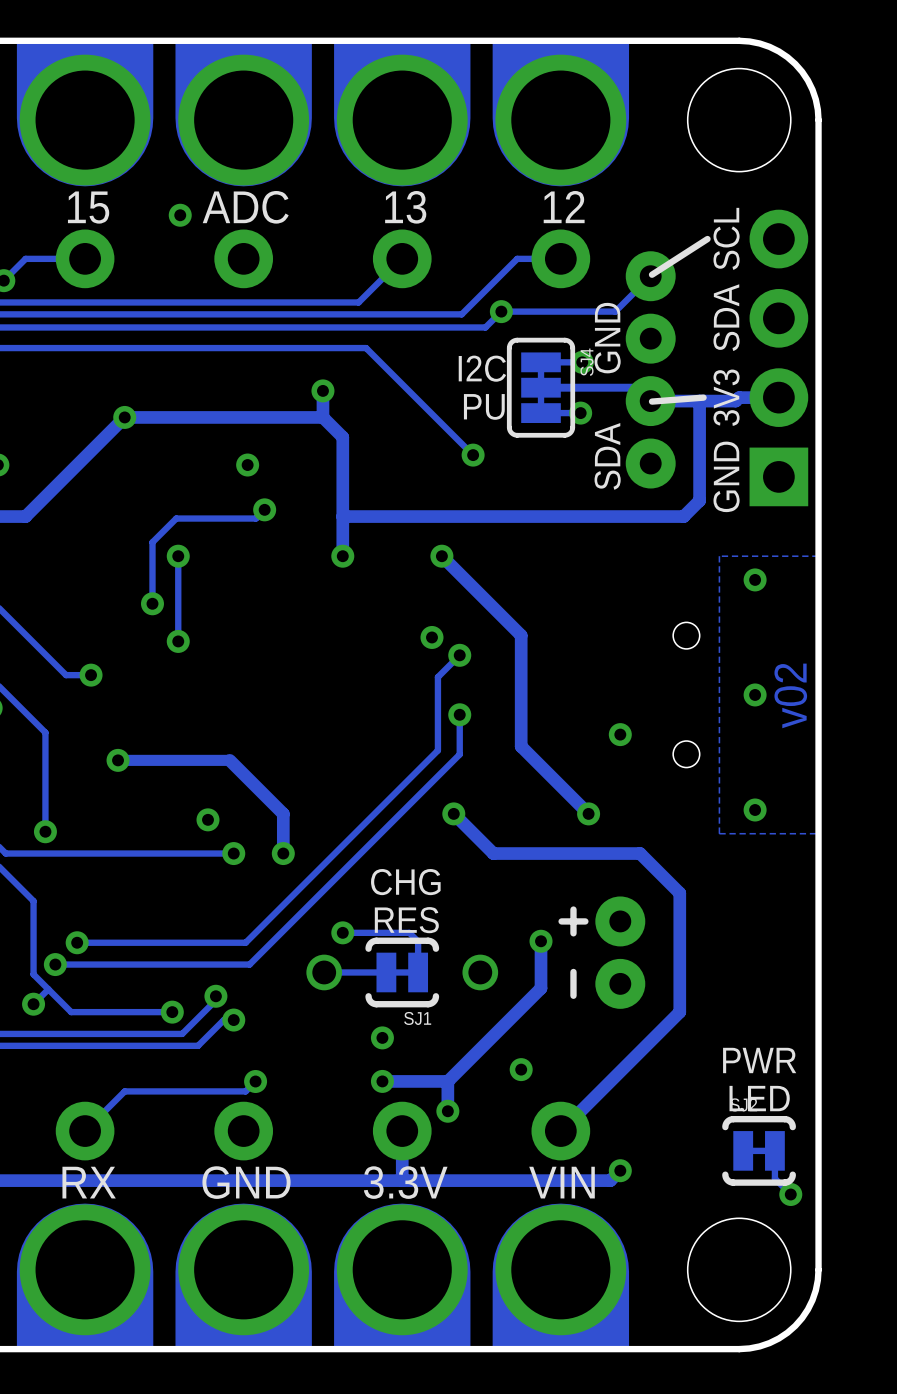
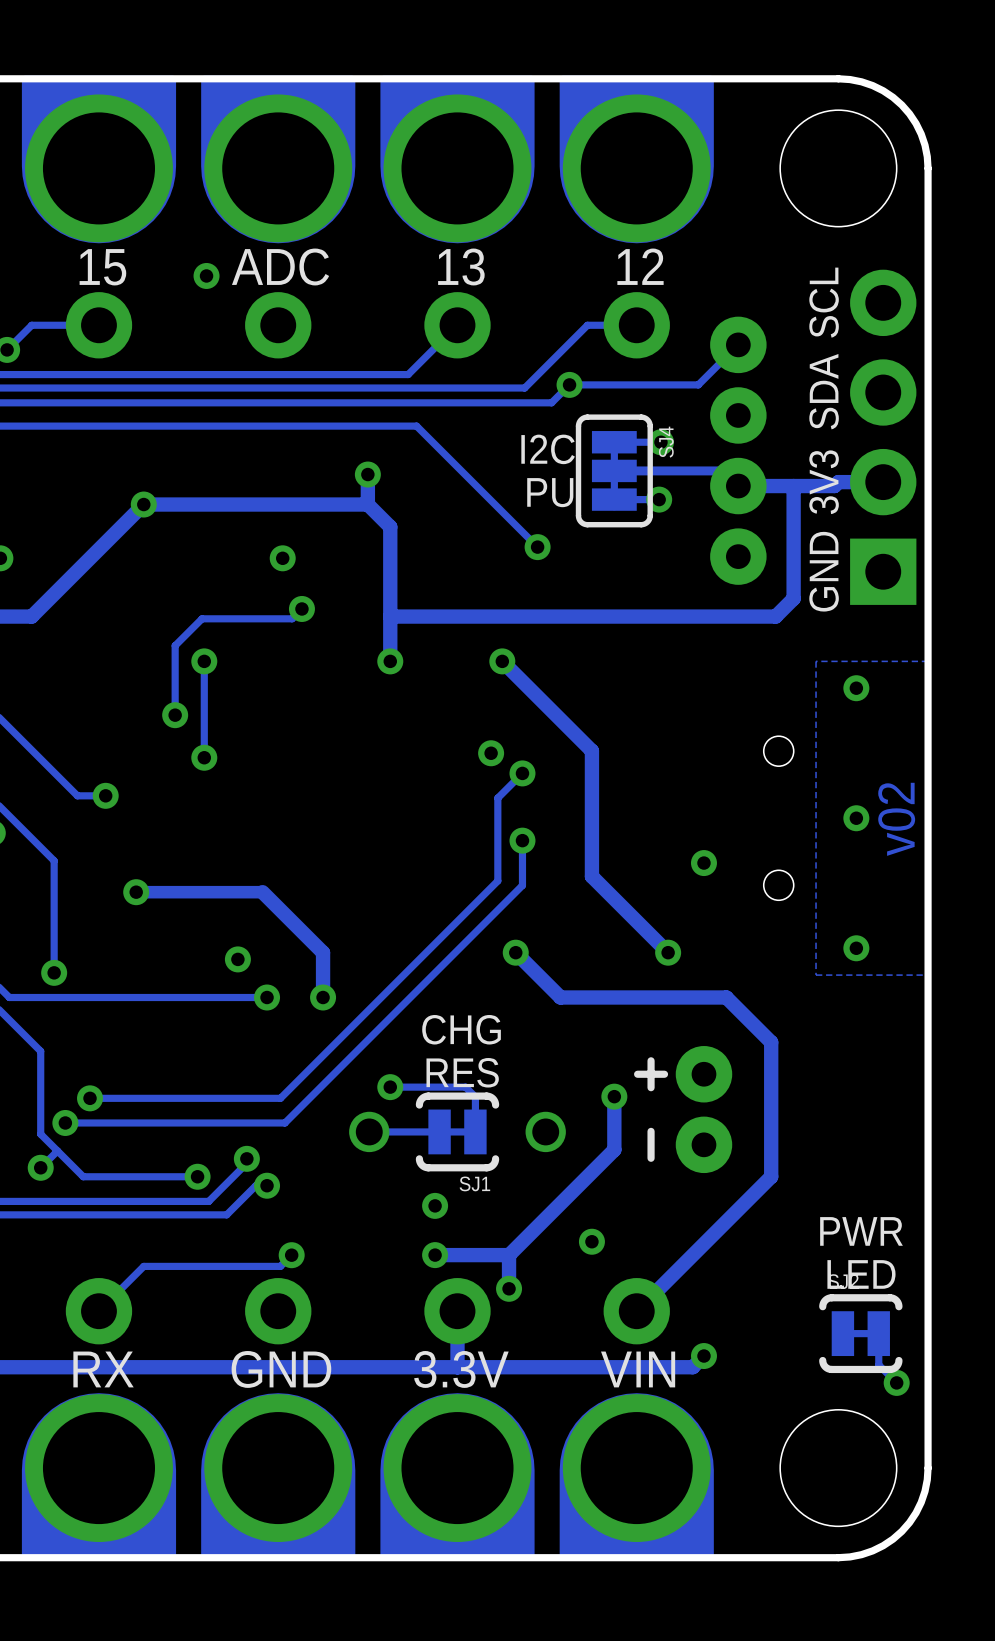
line: (707, 239) (652, 274) -> none
text: GND (607, 338) -> none
line: (703, 397) (652, 401) -> none
text: SDA (607, 456) -> none

